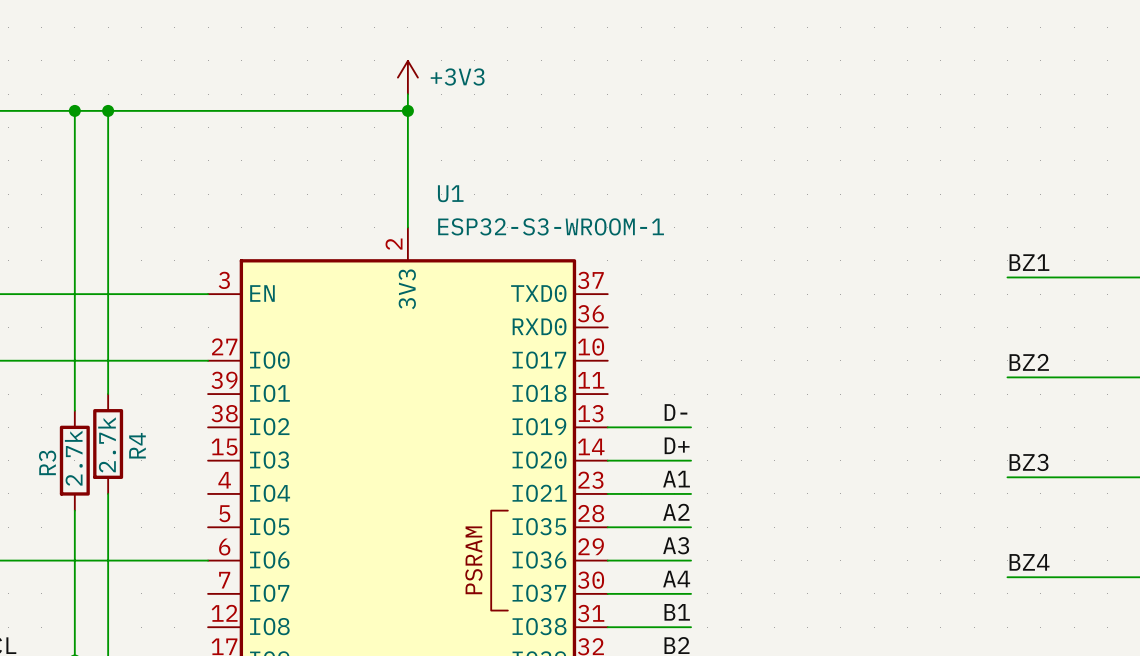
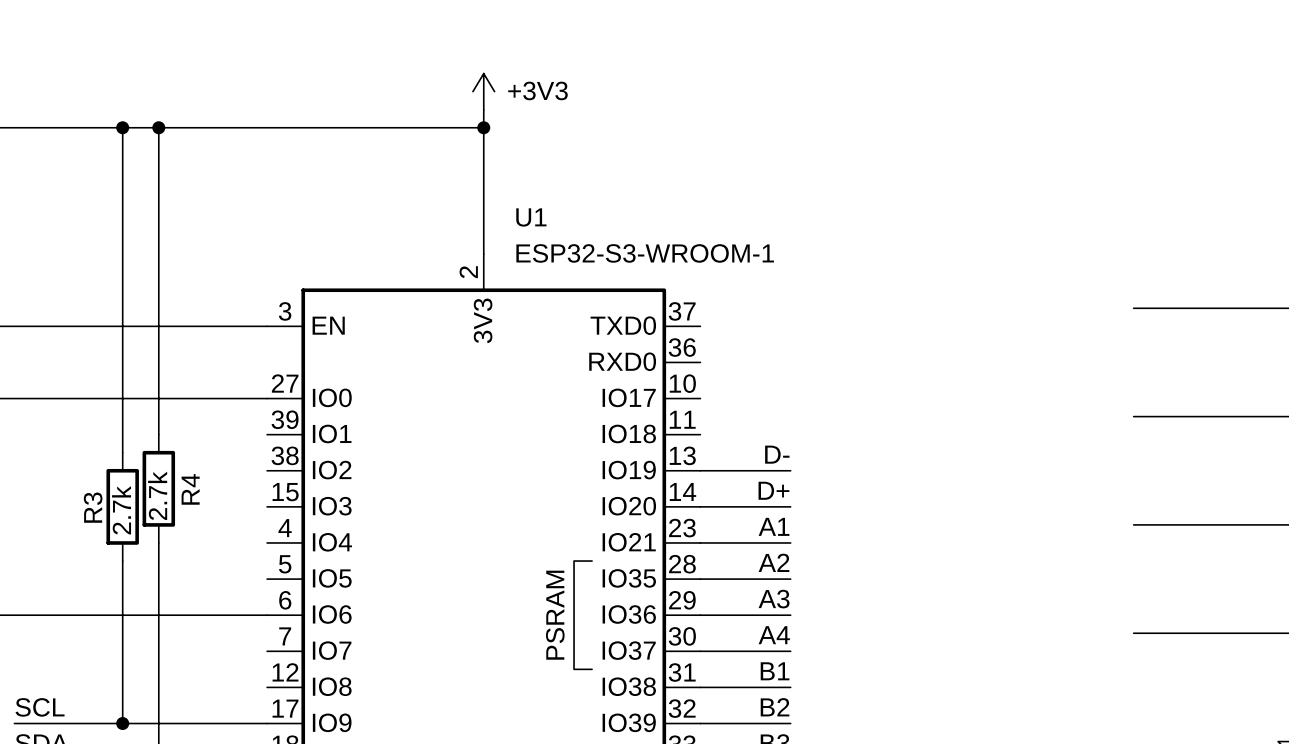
label: BZ1 (1029, 262) -> none
label: BZ2 (1029, 362) -> none
label: BZ3 (1029, 462) -> none
label: BZ4 (1029, 562) -> none

